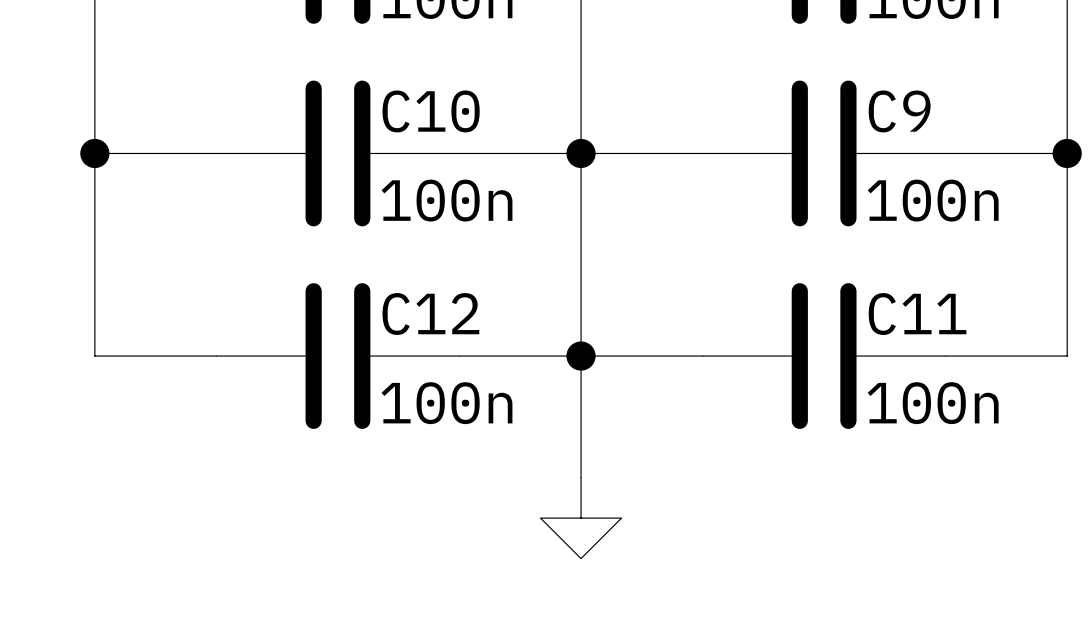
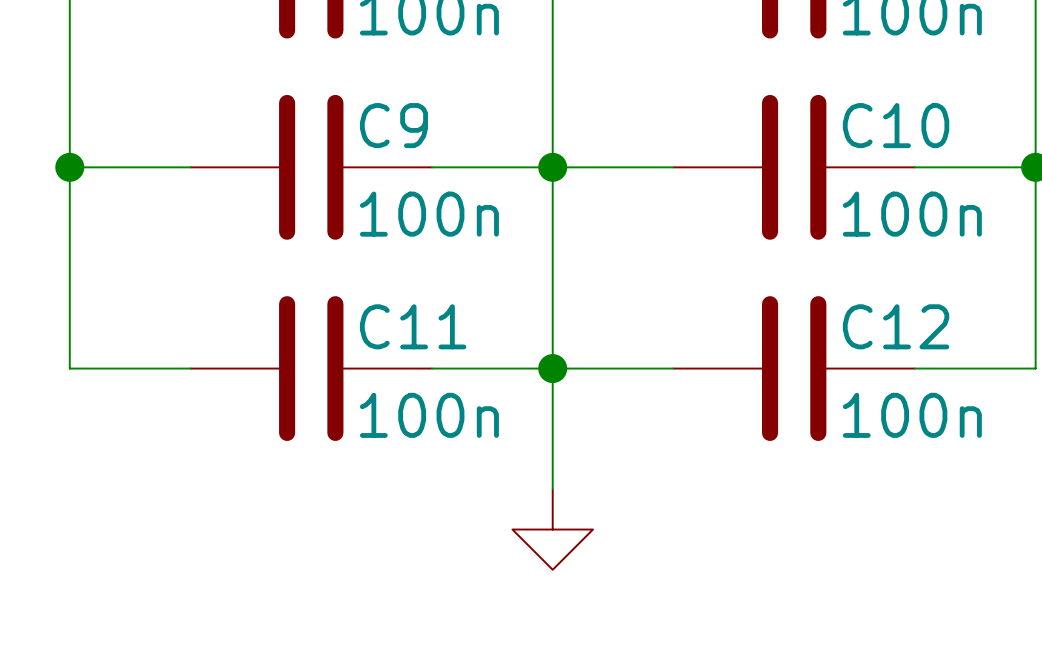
C10 name: C10 (431, 111) -> C9 (393, 125)
C9 name: C9 (899, 111) -> C10 (896, 125)
C12 name: C12 (430, 314) -> C11 (413, 326)
C11 name: C11 (917, 314) -> C12 (896, 326)

